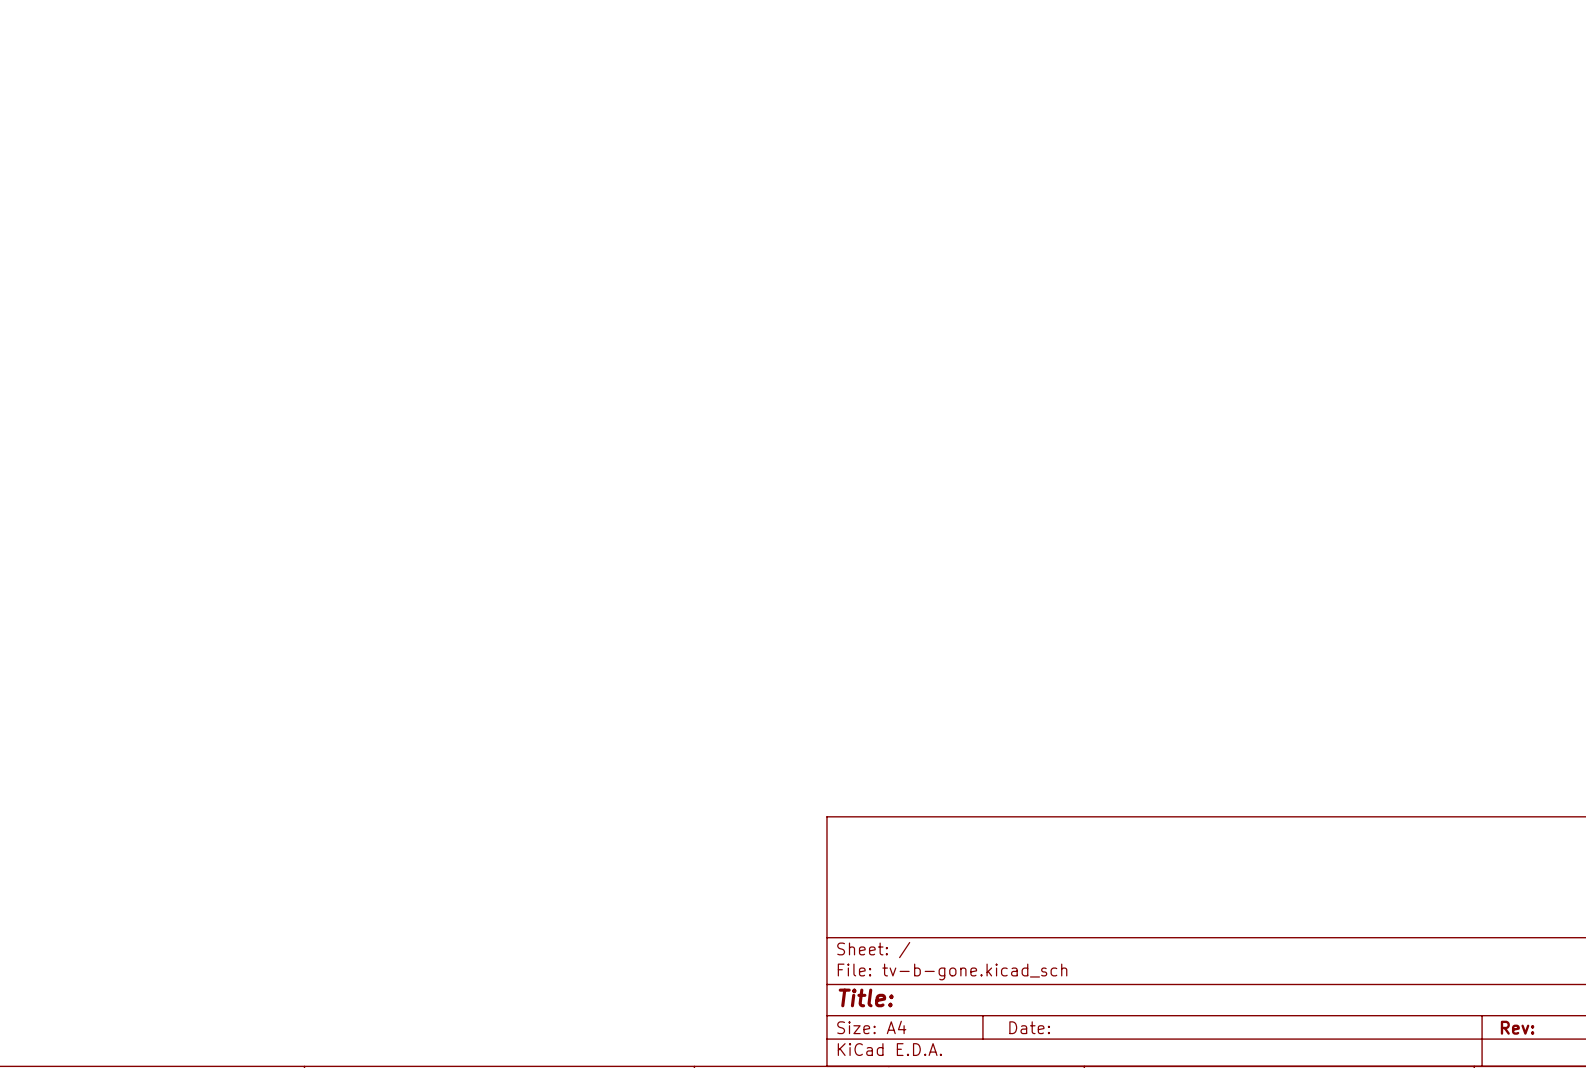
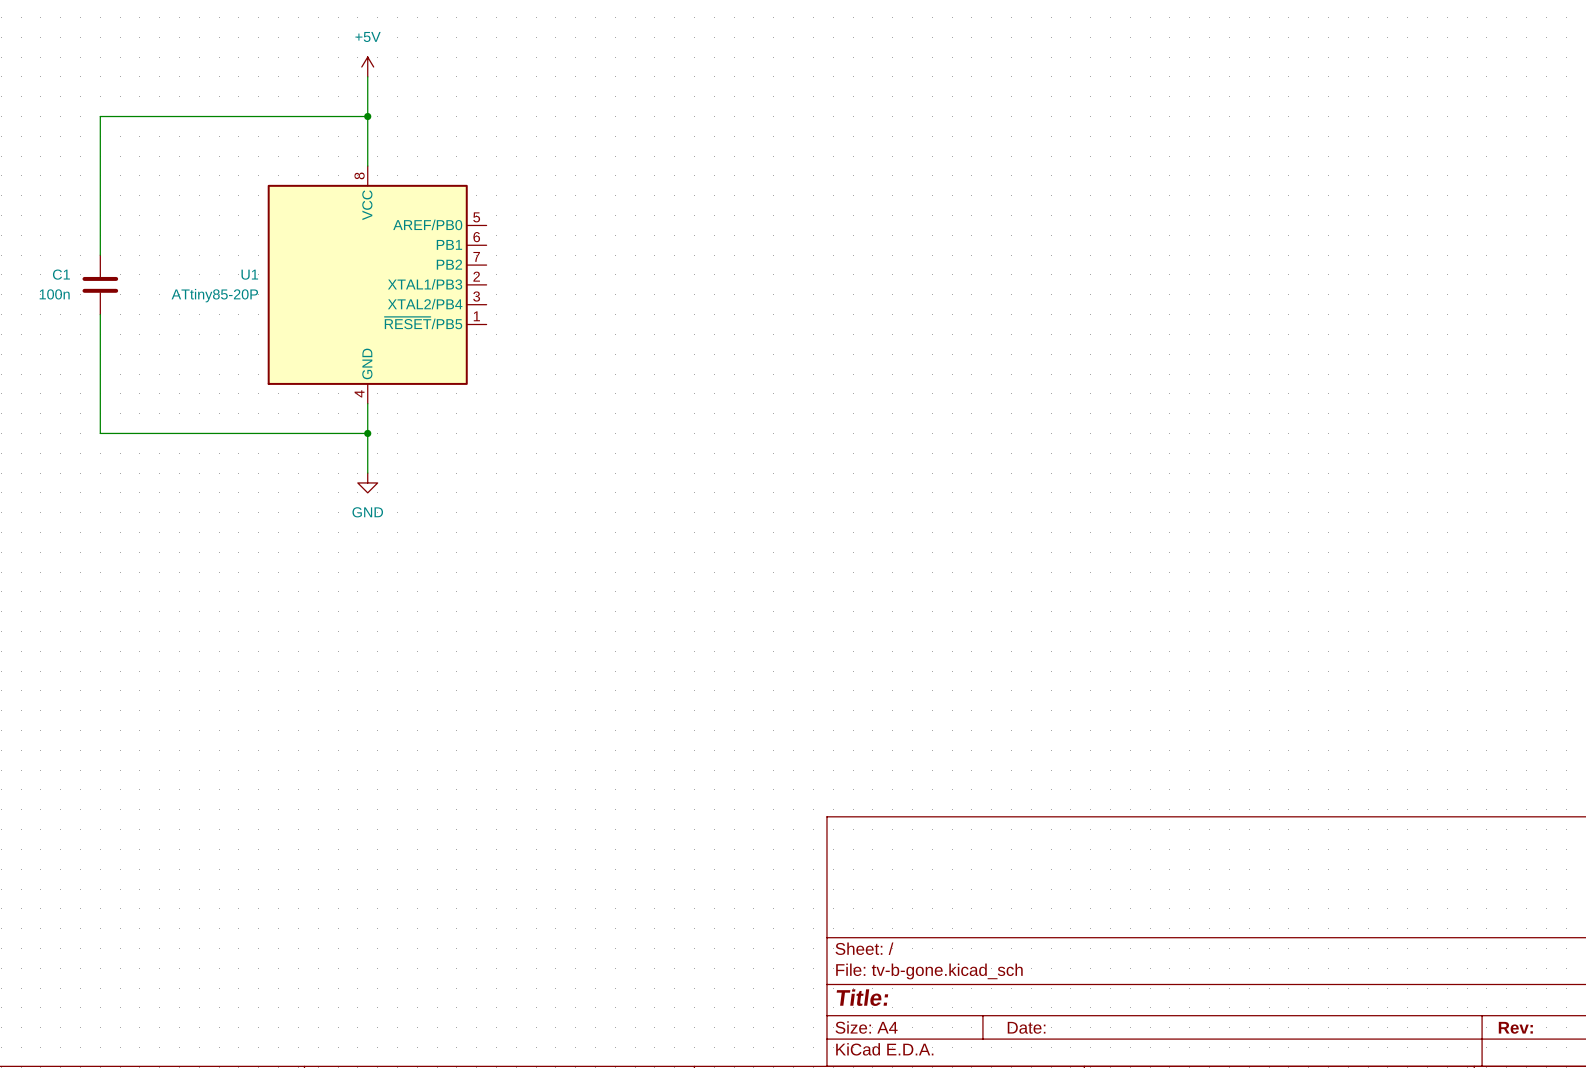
power symbol: none -> +5V (367, 66)
wire: none -> (367, 76) (367, 166)
wire: none -> (367, 116) (100, 116) (100, 255)
junction: none -> (367, 116)
C1: none -> 100n (100, 284)
U1: none -> ATtiny85-20P (377, 284)
wire: none -> (100, 314) (100, 433) (367, 433)
wire: none -> (367, 403) (367, 473)
junction: none -> (367, 433)
power symbol: none -> GND (367, 482)

